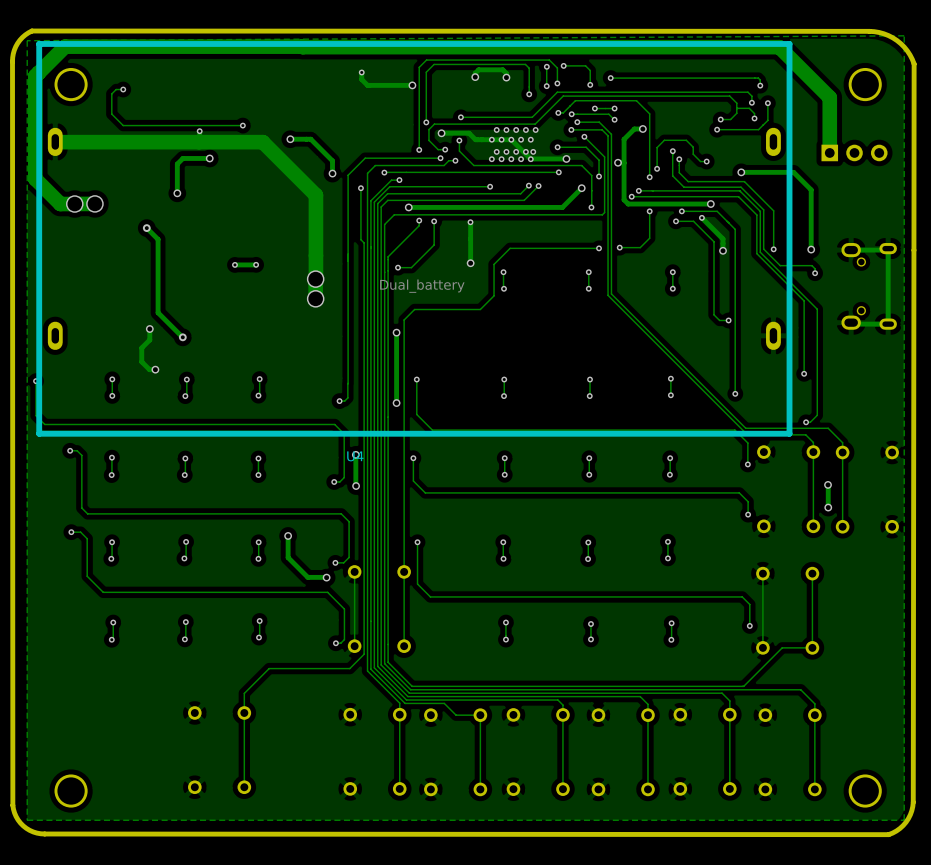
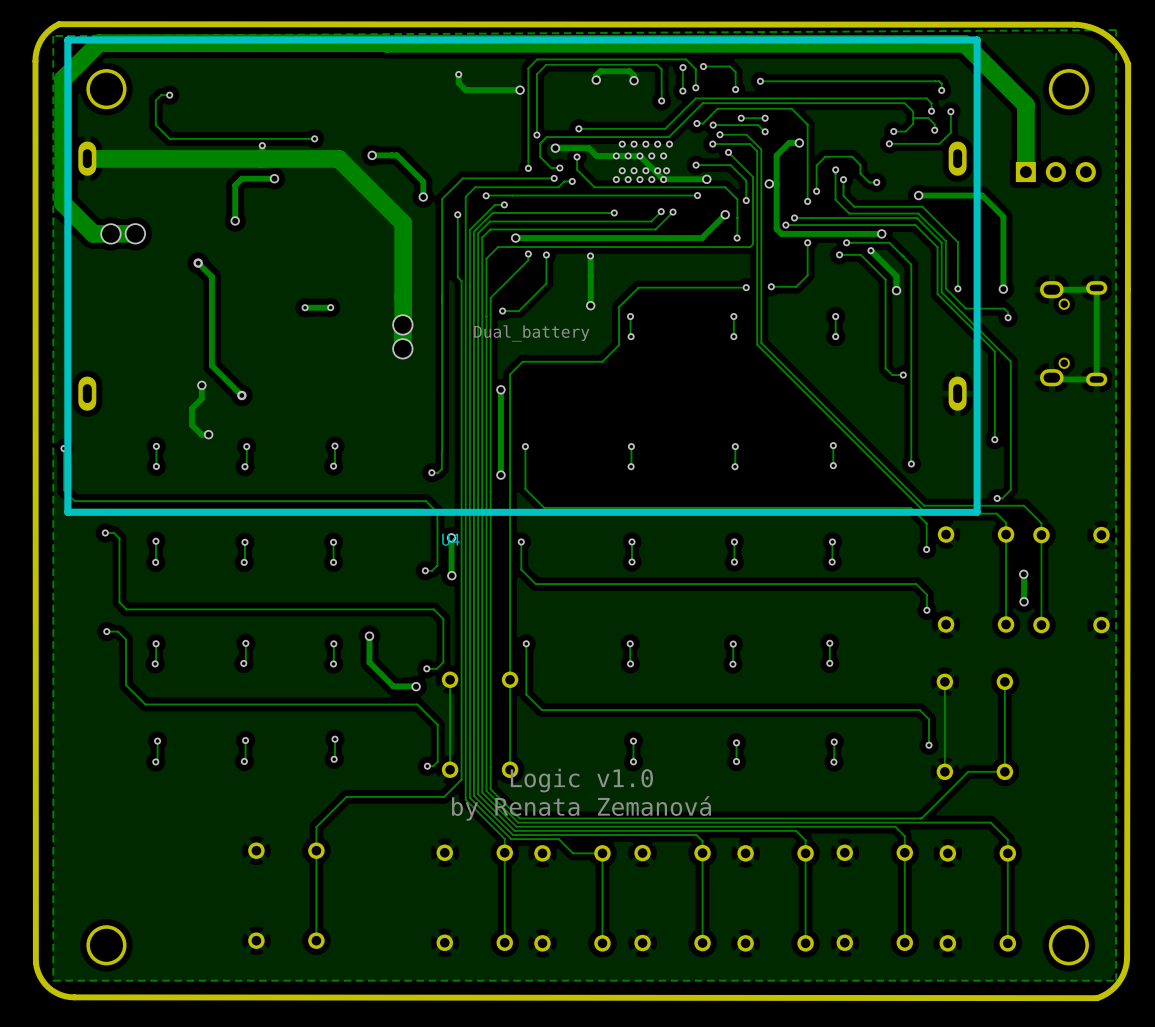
text: none -> Logic v1.0 (581, 780)
text: none -> by Renata Zemanová (581, 808)

